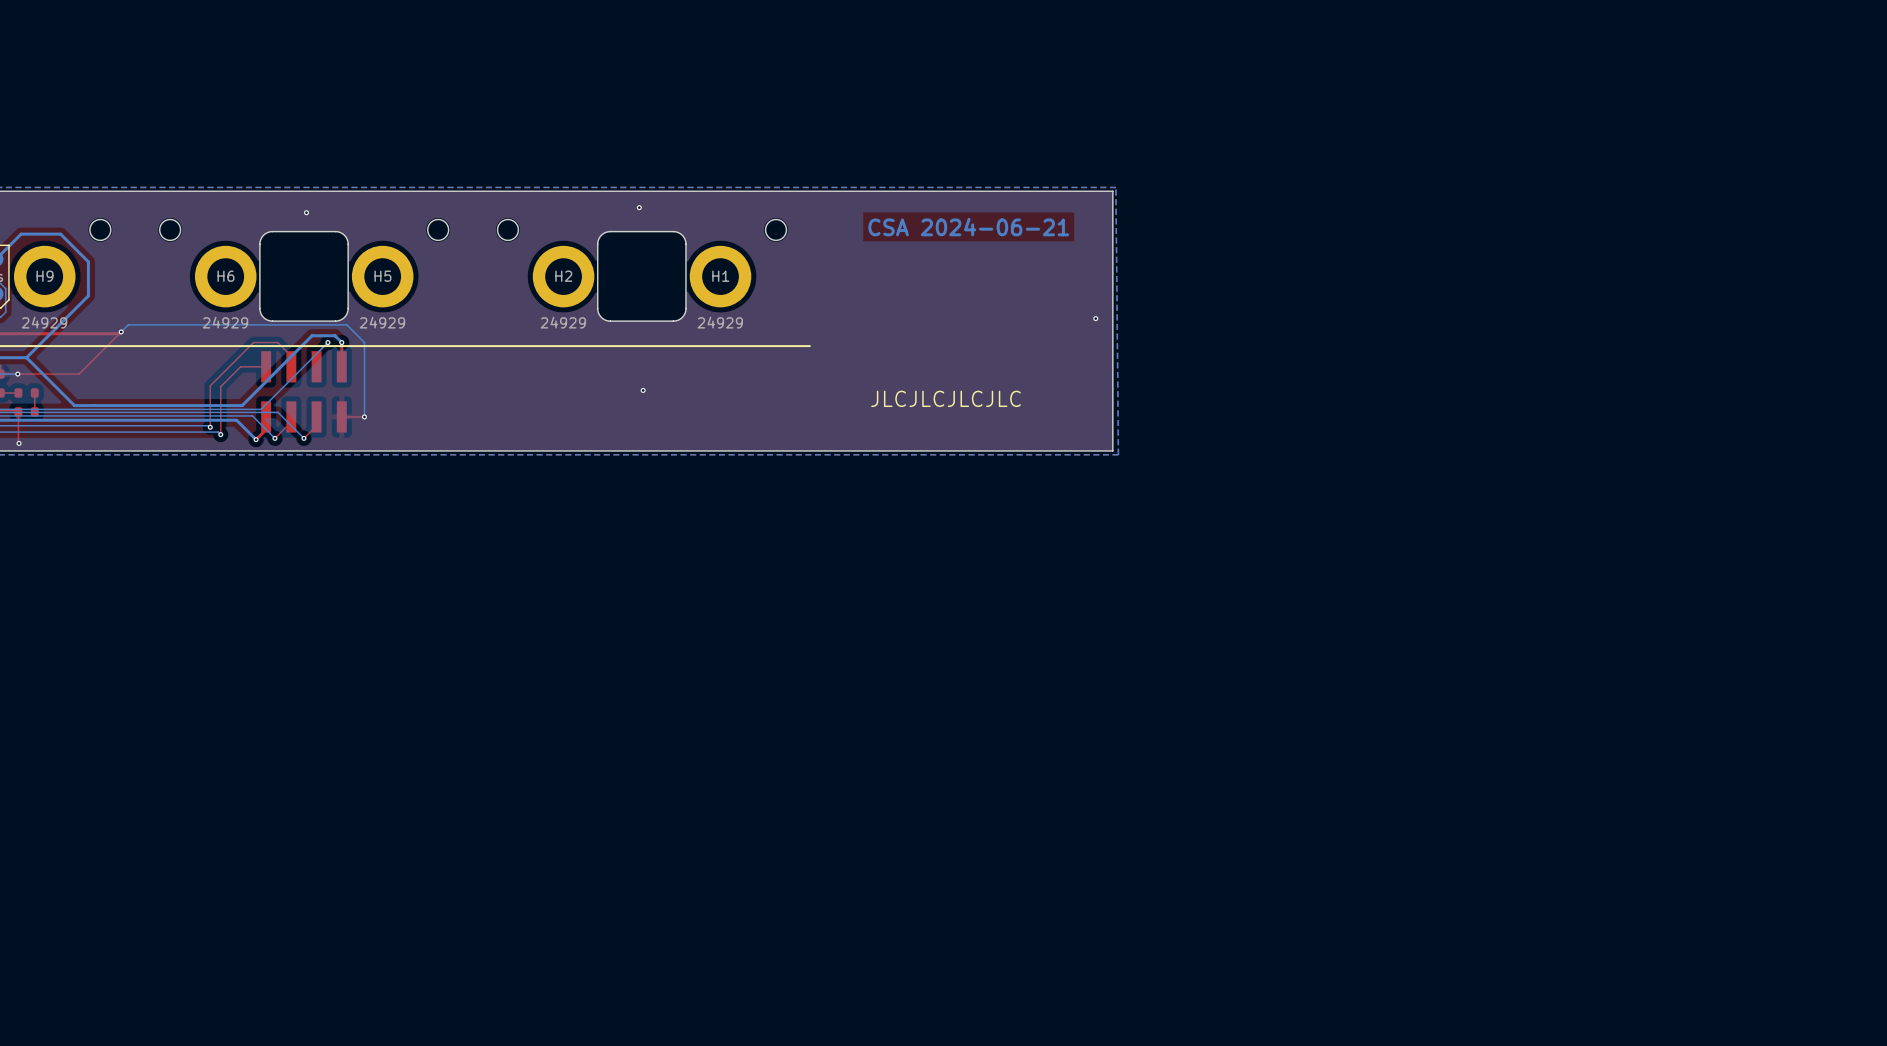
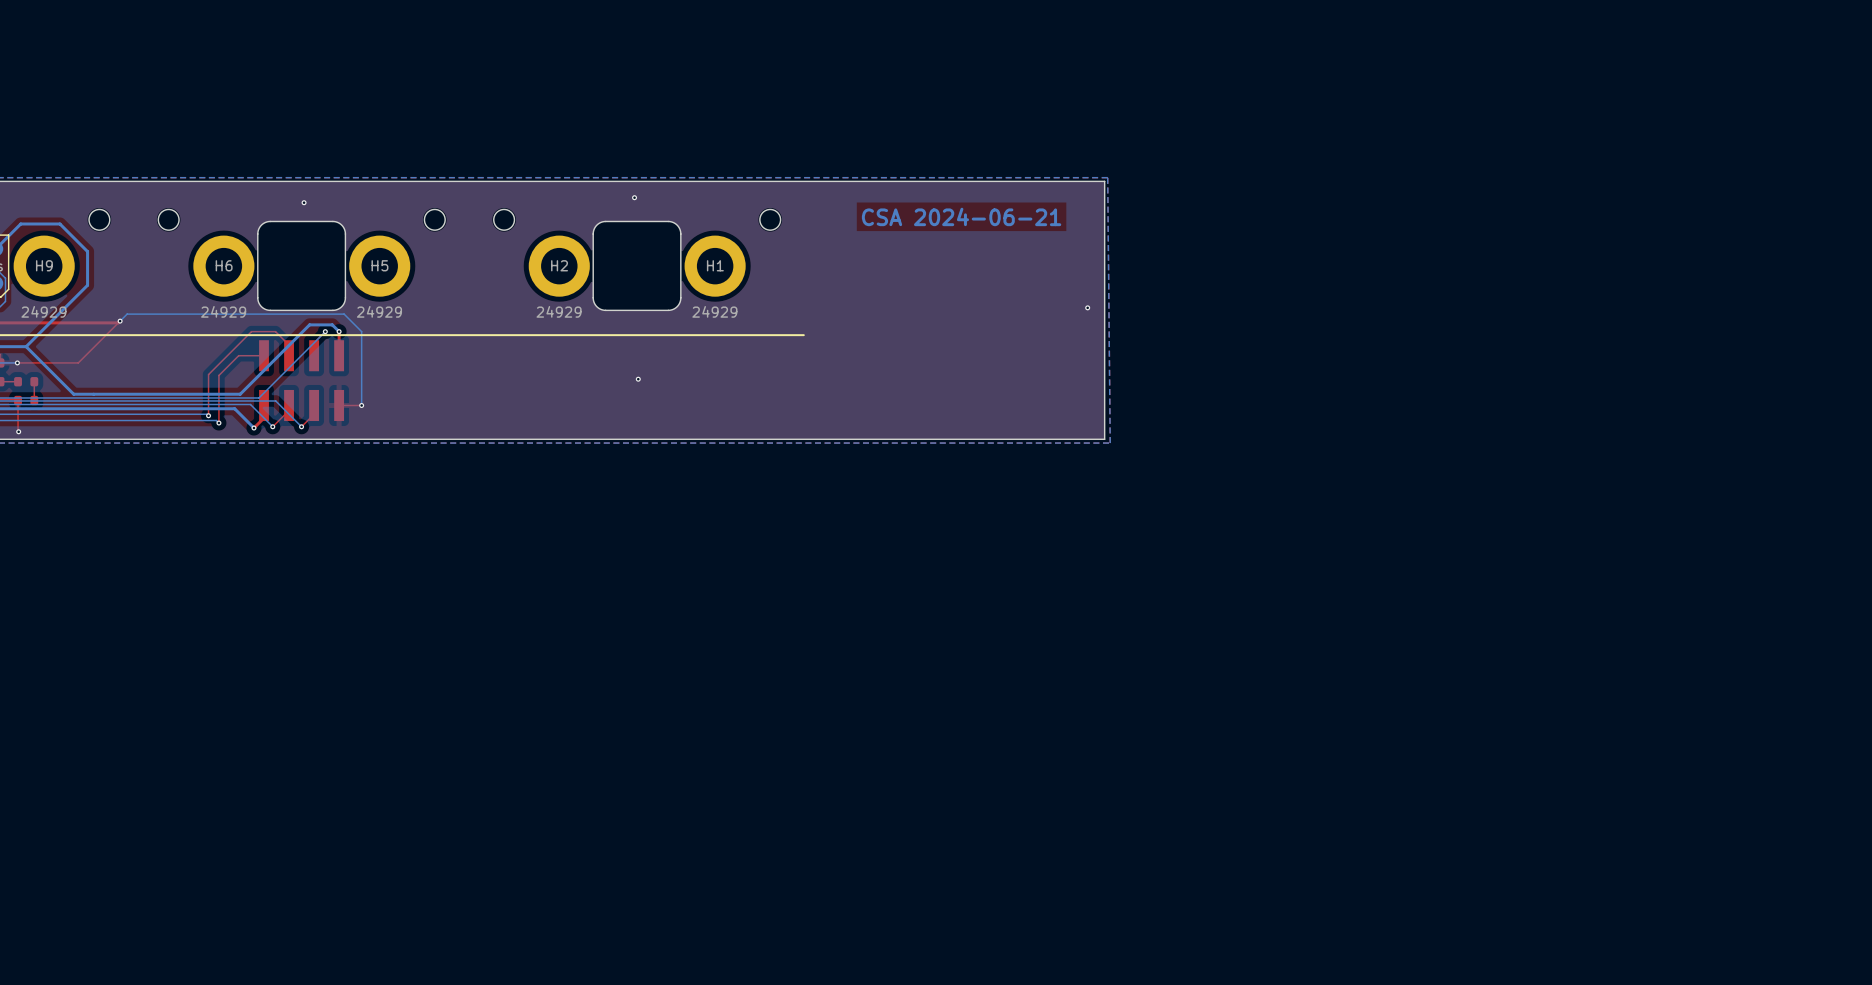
text: JLCJLCJLCJLC (946, 398) -> none

